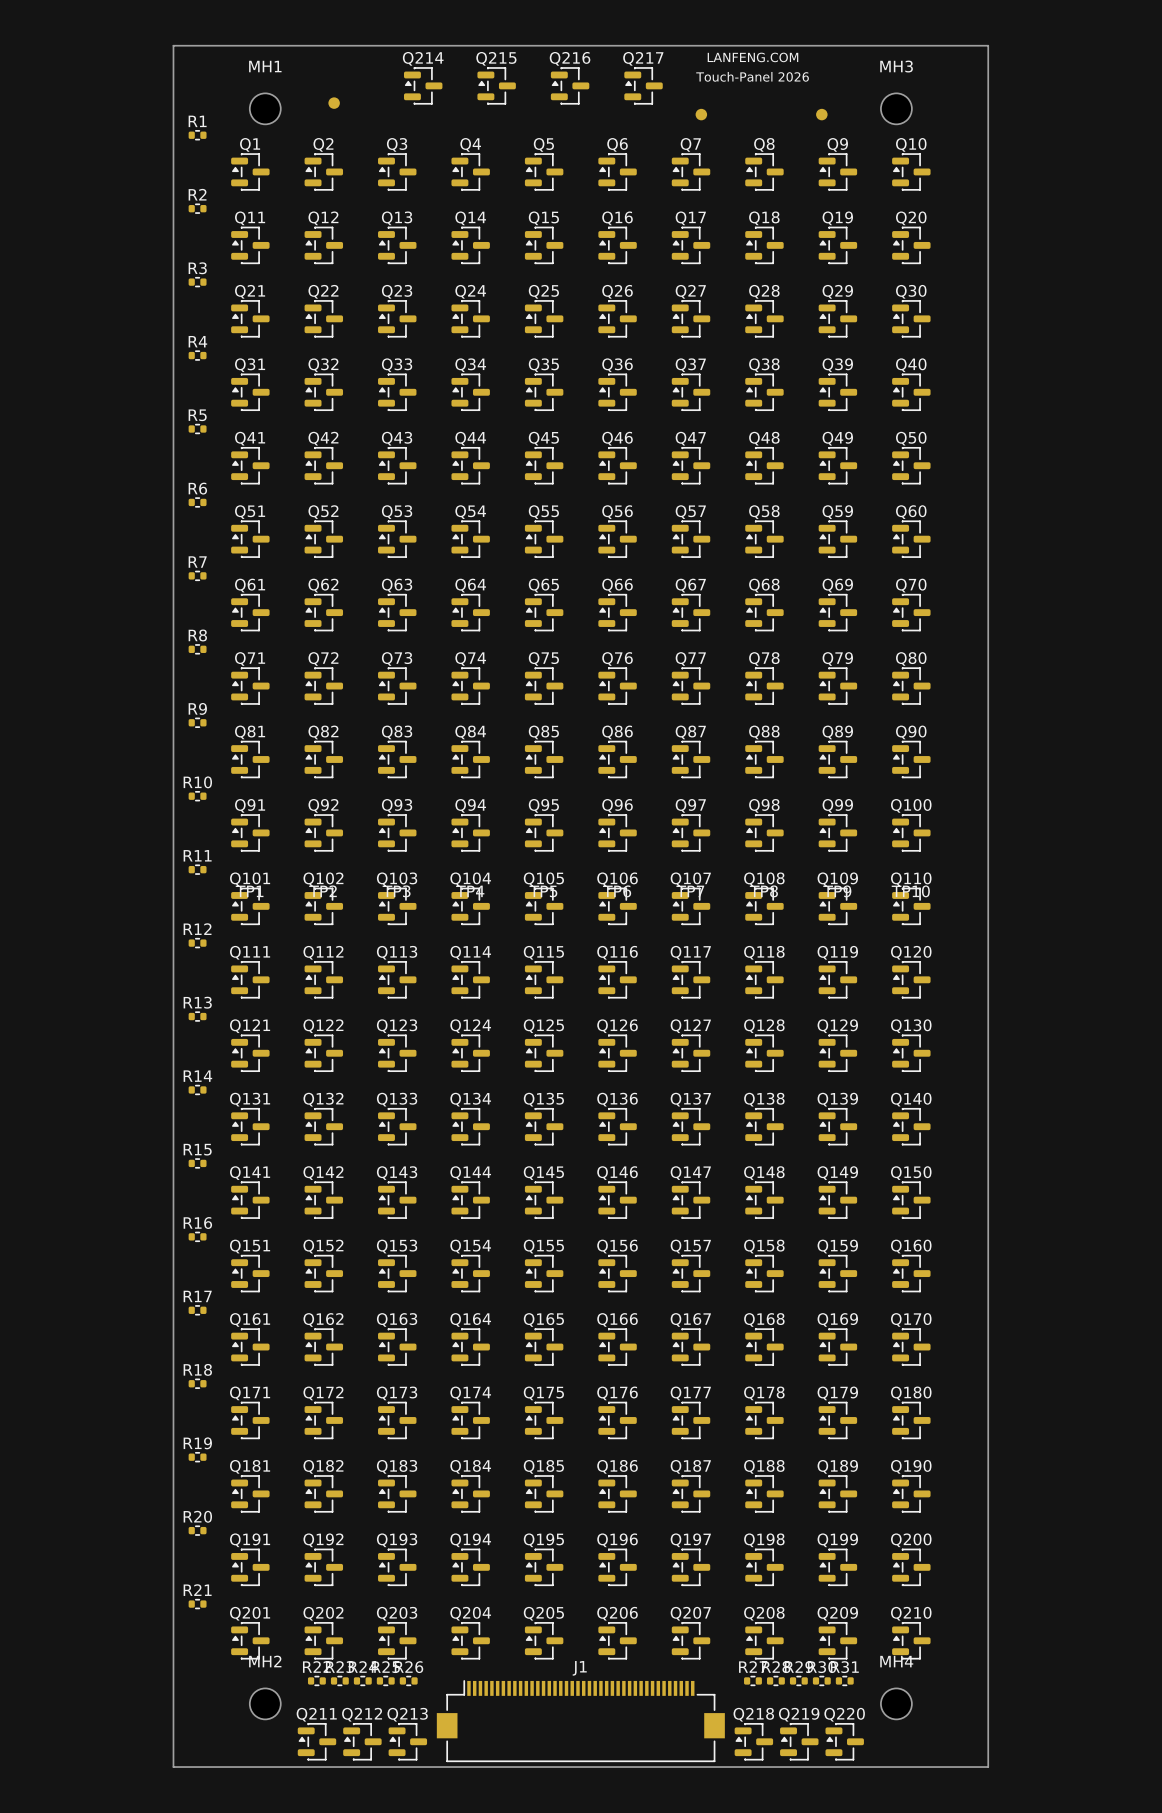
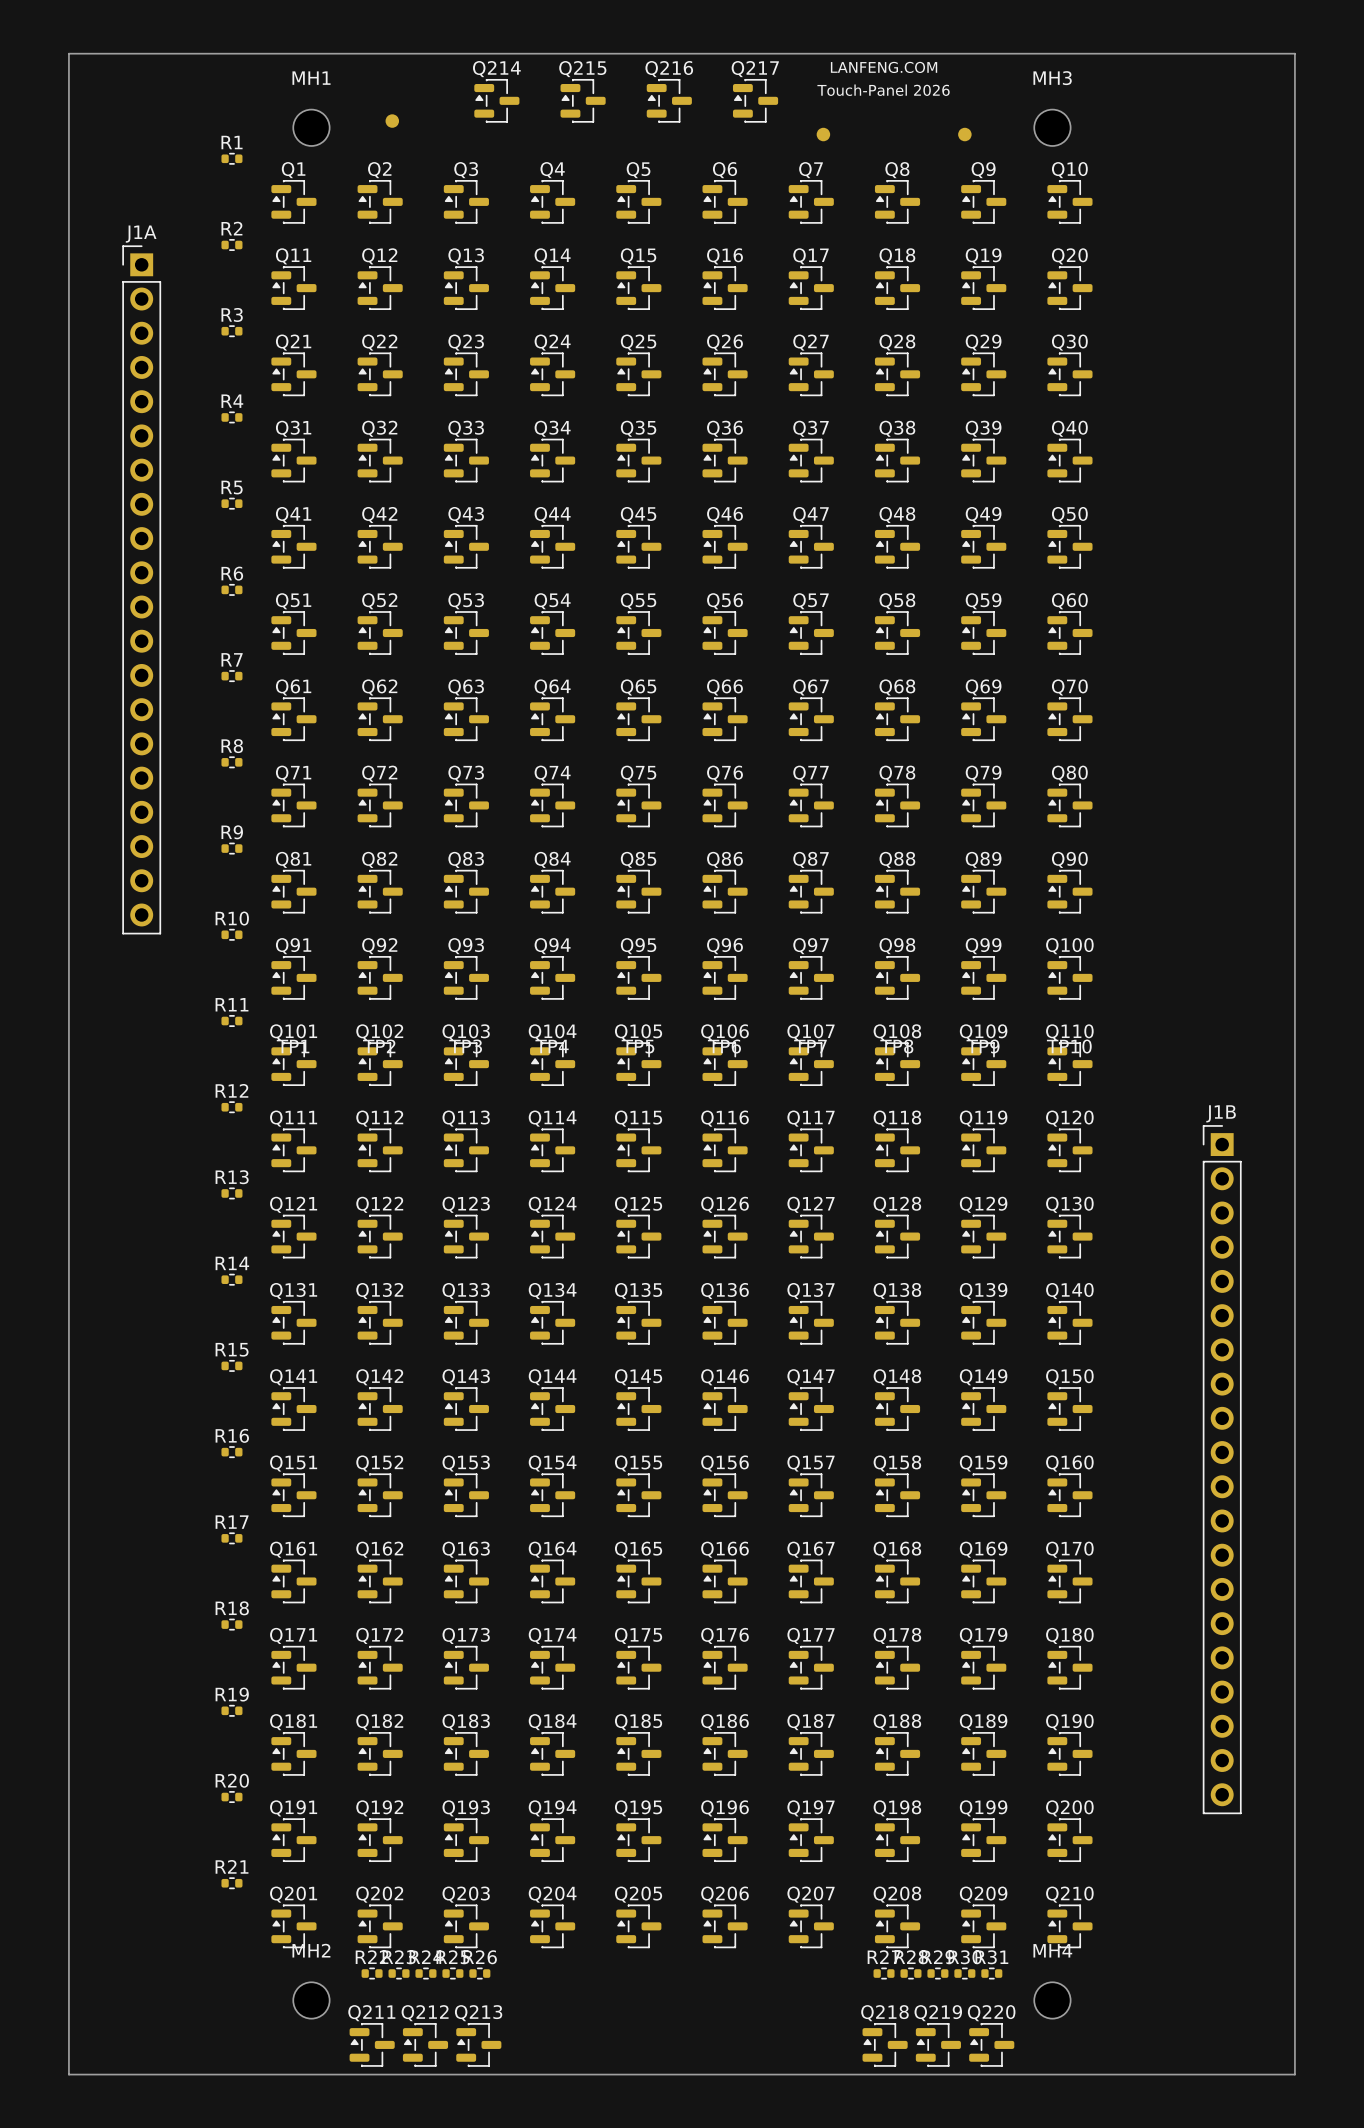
board edge: (173, 45) (173, 1767) -> (203, 53) (68, 53) (68, 2074) (203, 2074)
board edge: (988, 45) (988, 1767) -> (1160, 53) (1294, 53) (1294, 2074) (1160, 2074)
J1A: none -> (141, 589)
J1B: none -> (1222, 1469)
J1: (580, 1721) -> none

